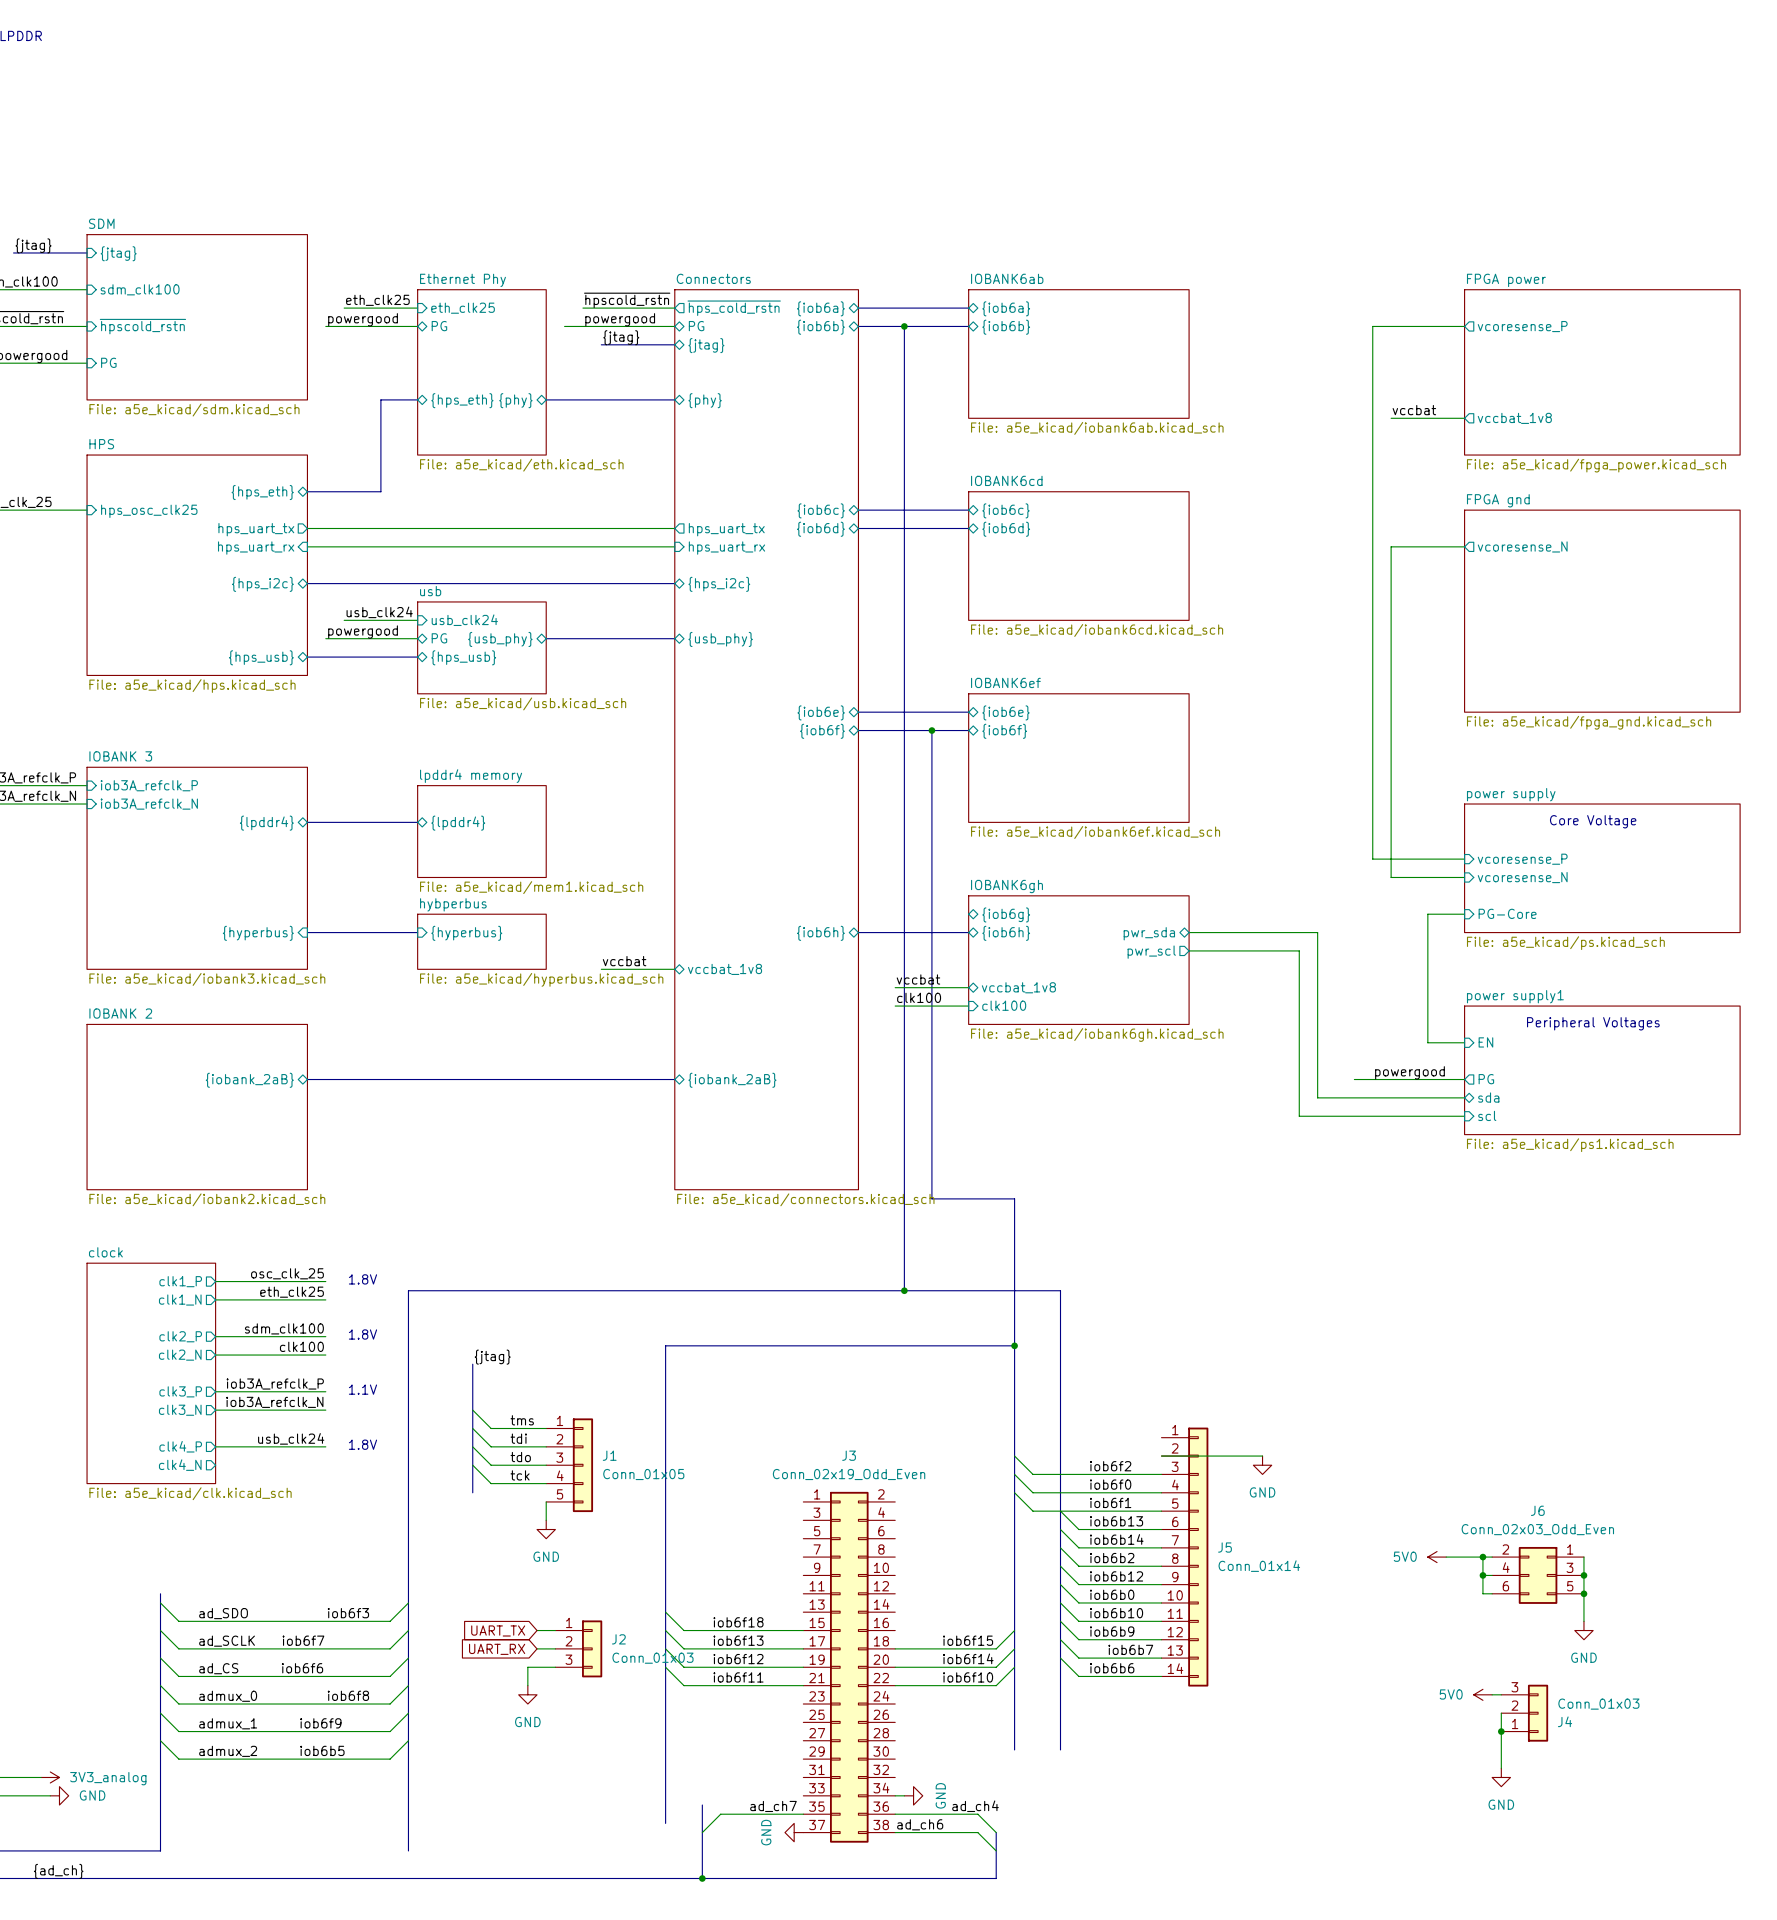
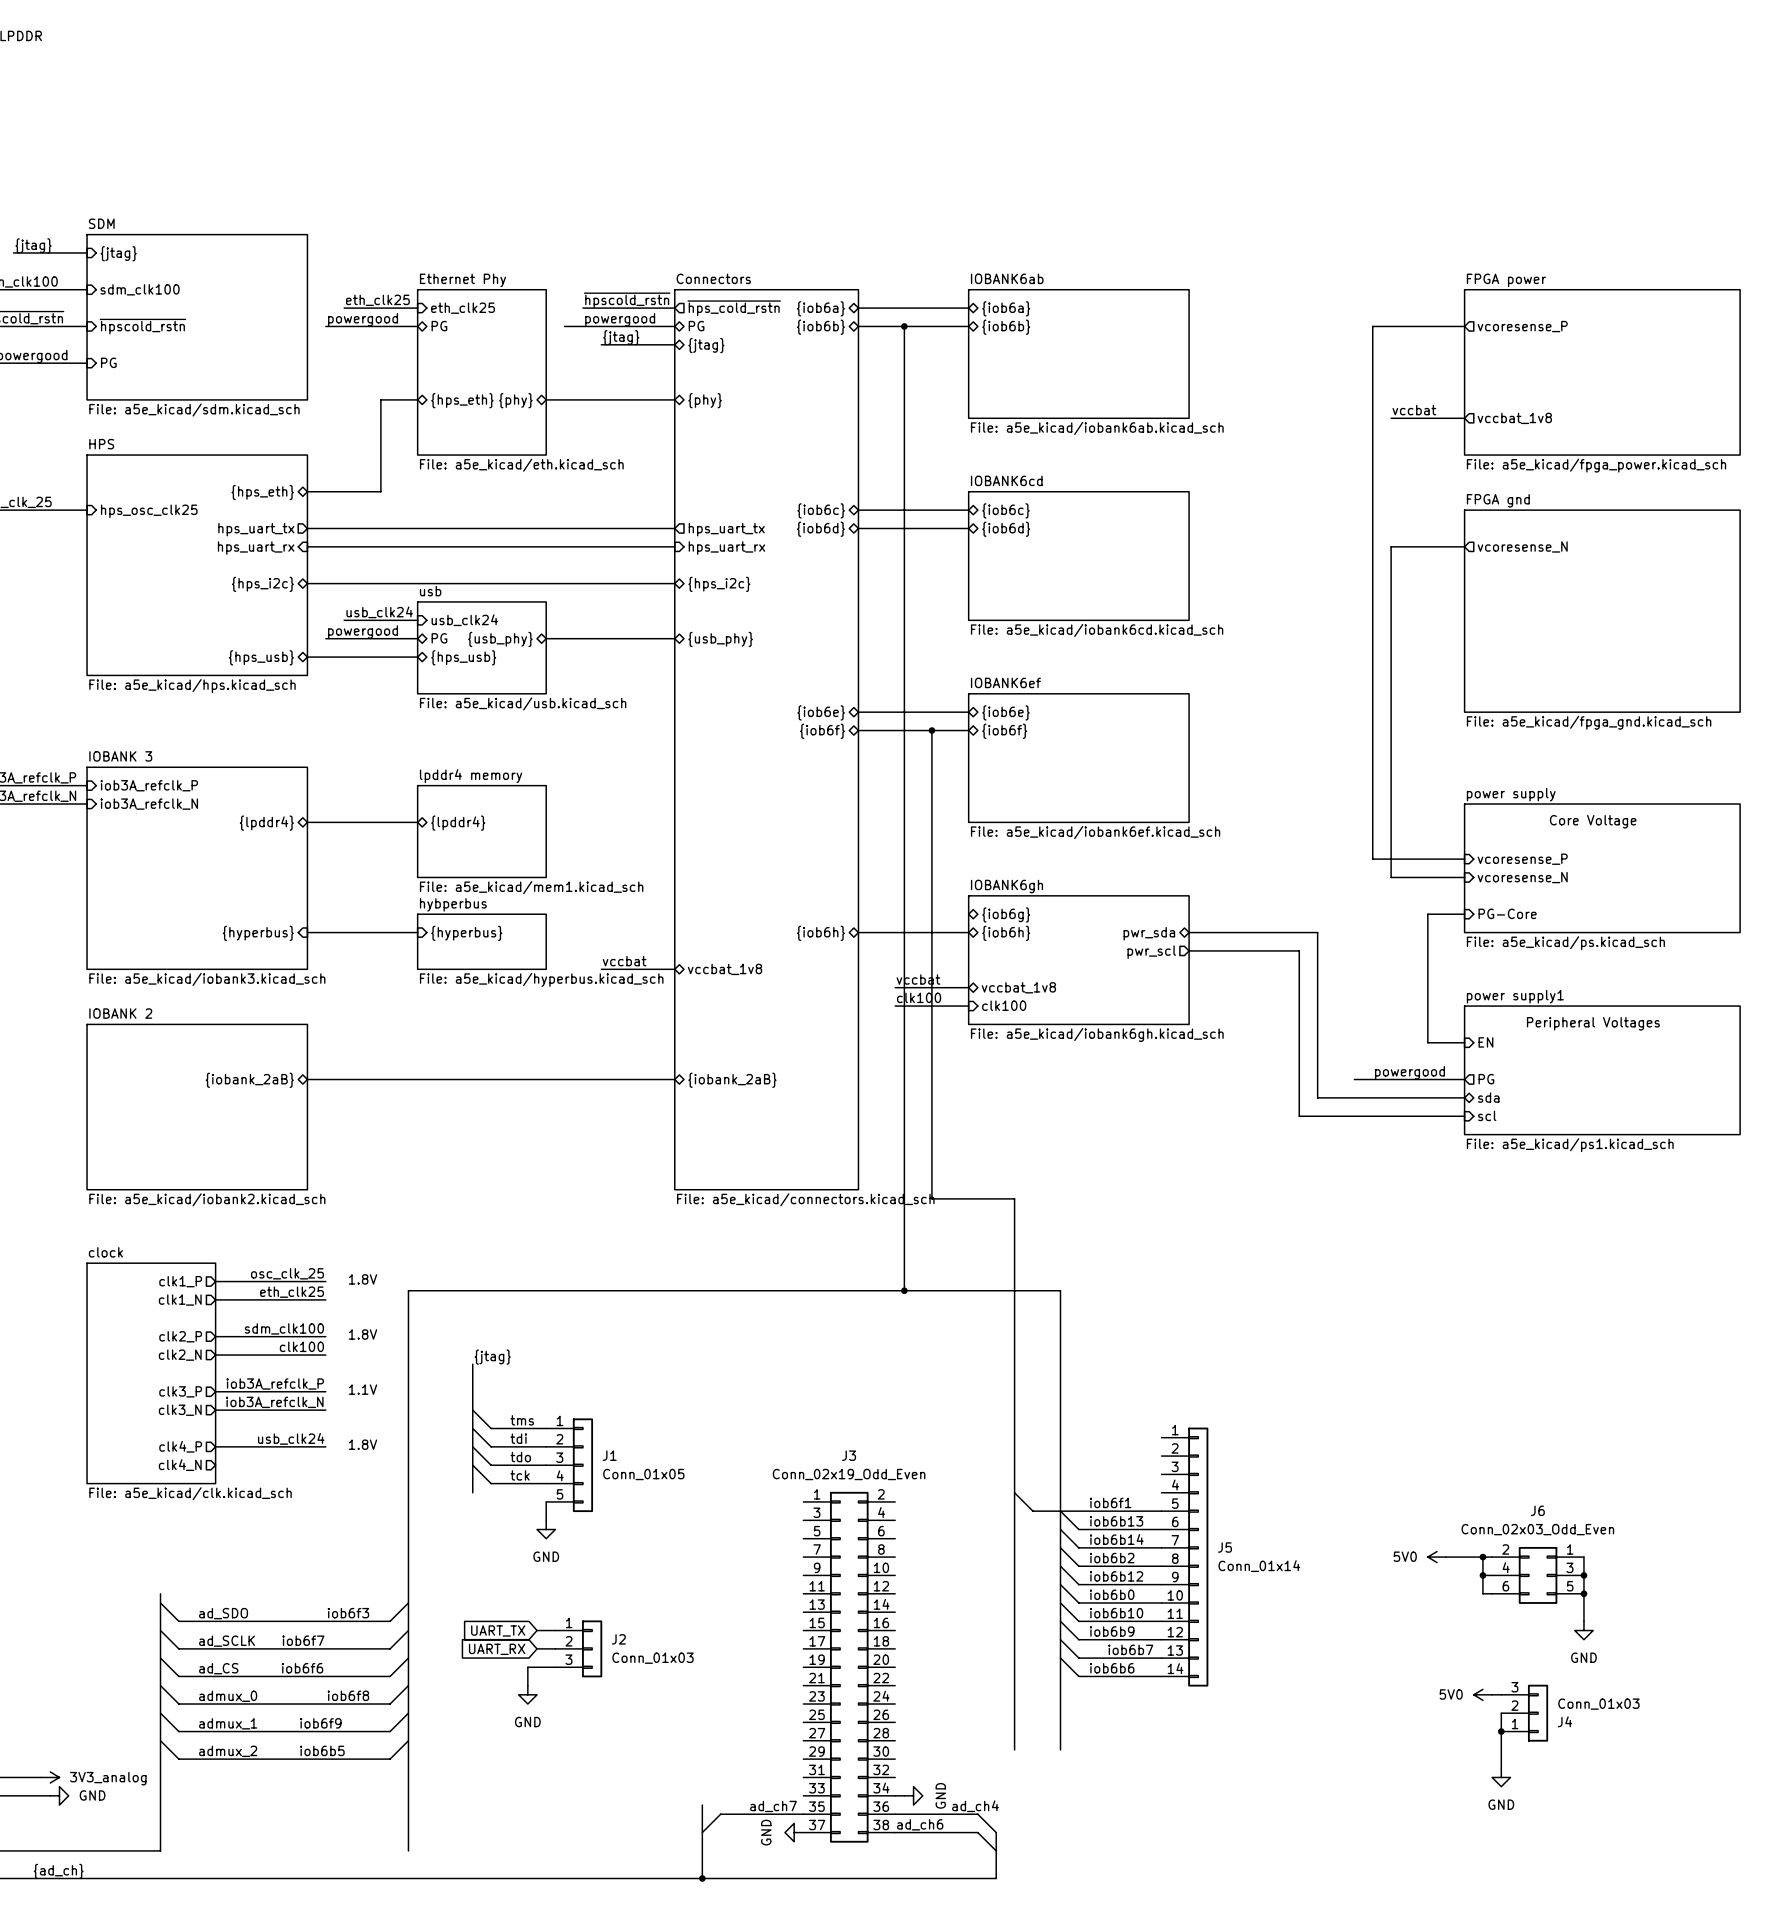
bus: (1014, 1345) (665, 1345) (665, 1823) -> none
junction: (1014, 1345) -> none
wire: (1014, 1456) (1032, 1474) (1161, 1474) -> none
wire: (1161, 1456) (1262, 1456) -> none
power symbol: GND (1262, 1465) -> none
label: iob6f2 (1110, 1466) -> none
wire: (1014, 1474) (1032, 1492) (1161, 1492) -> none
label: iob6f0 (1110, 1484) -> none
wire: (665, 1612) (683, 1630) (803, 1630) -> none
label: iob6f18 (738, 1622) -> none
wire: (665, 1630) (683, 1648) (803, 1648) -> none
wire: (1014, 1630) (996, 1648) (895, 1648) -> none
label: iob6f13 (738, 1640) -> none
label: iob6f15 (968, 1640) -> none
wire: (665, 1648) (683, 1667) (803, 1667) -> none
wire: (1014, 1648) (996, 1667) (895, 1667) -> none
label: iob6f14 (968, 1658) -> none
label: iob6f12 (738, 1659) -> none
wire: (665, 1667) (683, 1685) (803, 1685) -> none
wire: (1014, 1667) (996, 1685) (895, 1685) -> none
label: iob6f11 (738, 1677) -> none
label: iob6f10 (968, 1677) -> none

